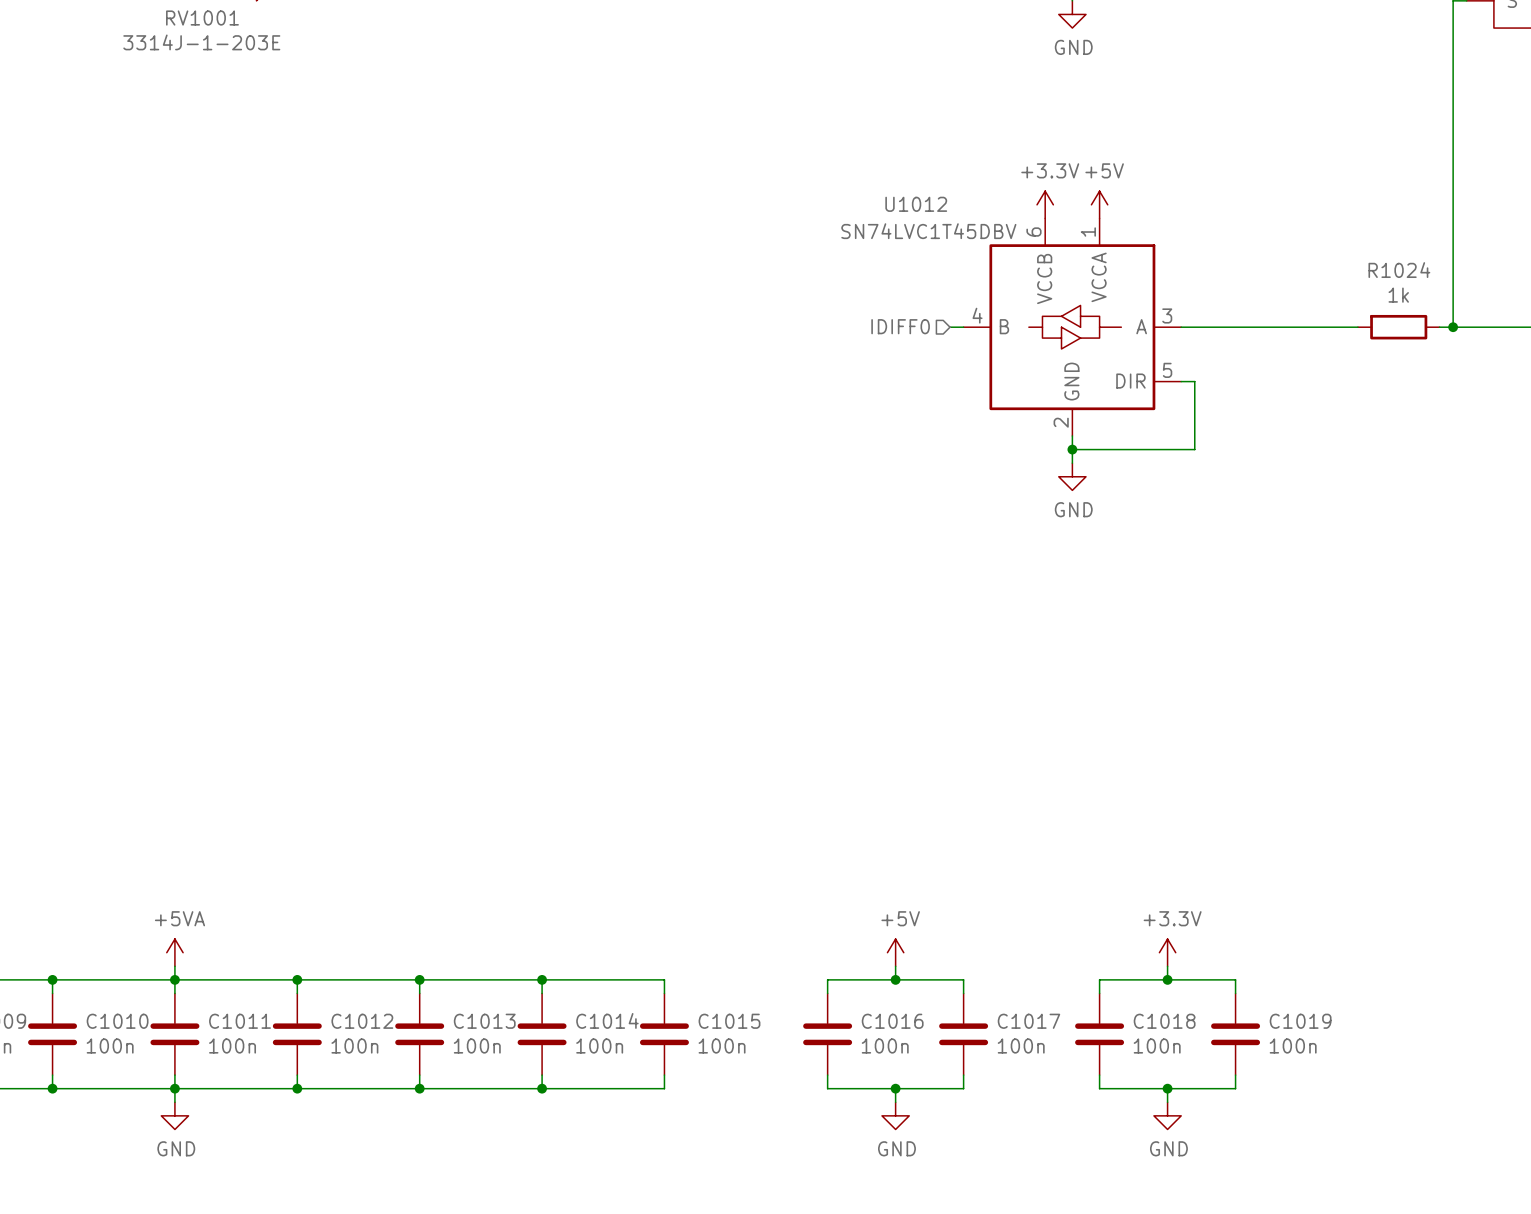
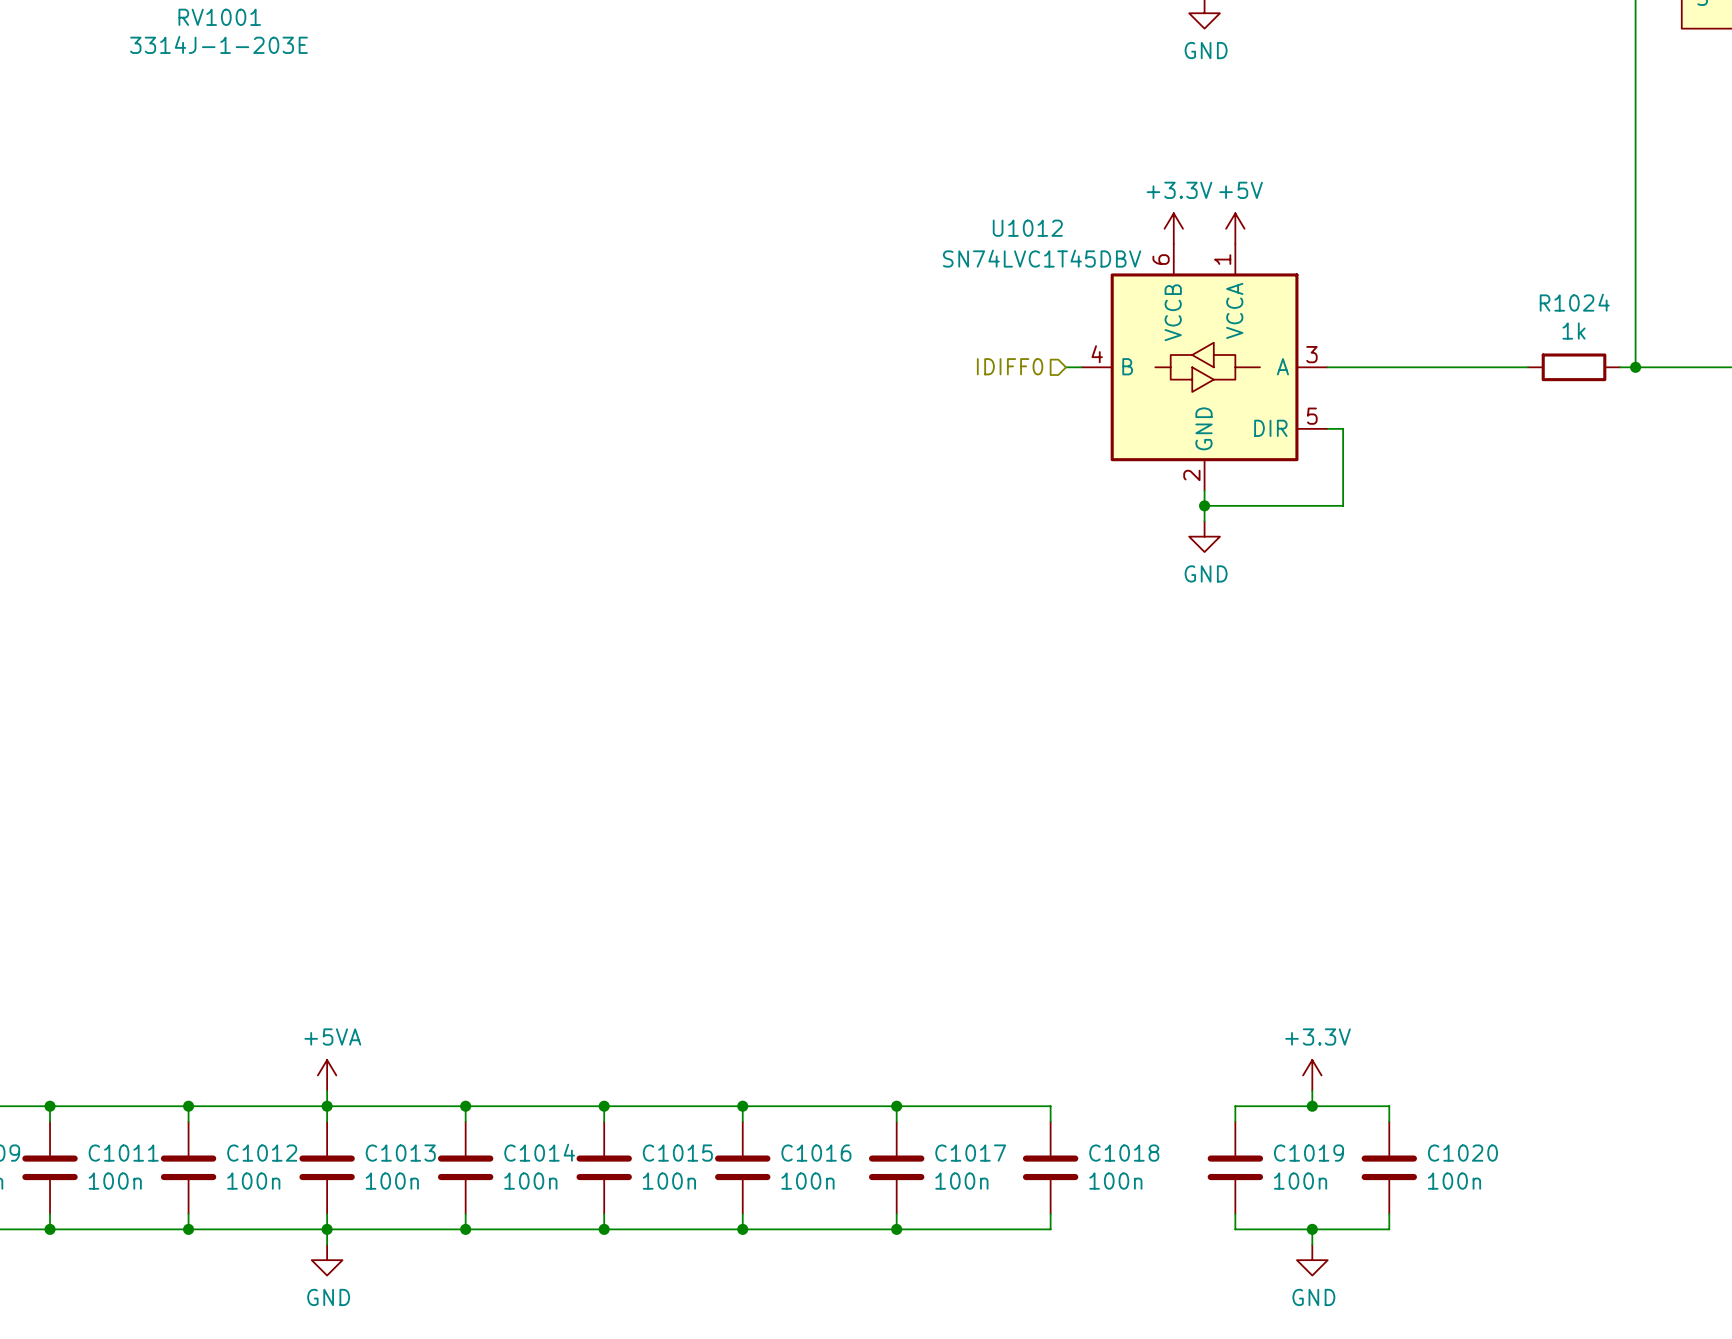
power symbol position: +5VA (174, 952) -> +5VA (327, 1075)
power symbol: +5V (895, 952) -> none
wire: (174, 966) (174, 979) -> (327, 1090) (327, 1106)
wire: (895, 966) (895, 979) -> (896, 1106) (896, 1121)
junction: none -> (742, 1106)
junction: none -> (896, 1106)
wire: (827, 979) (827, 993) -> (927, 1106) (742, 1106)
junction: (895, 979) -> none
wire: (936, 979) (963, 979) (963, 993) -> (1050, 1106) (1050, 1121)
C1014 name: C1014 (607, 1020) -> C1015 (677, 1153)
C1010 name: C1010 (117, 1021) -> C1011 (123, 1153)
C1011 name: C1011 (239, 1021) -> C1012 (262, 1153)
C1012 name: C1012 (362, 1021) -> C1013 (400, 1153)
C1013 name: C1013 (484, 1021) -> C1014 (539, 1152)
C1015 name: C1015 (729, 1021) -> C1016 (816, 1153)
C1018 name: C1018 (1164, 1021) -> C1019 (1308, 1153)
C1019 name: C1019 (1300, 1021) -> C1020 (1462, 1153)
C1016: 100n (827, 1034) -> none
C1018: none -> 100n (1050, 1167)
C1017 position: (963, 1034) -> (896, 1167)
wire: (827, 1075) (827, 1088) -> (742, 1229) (927, 1229)
wire: (963, 1075) (963, 1088) (936, 1088) -> (1050, 1213) (1050, 1229)
wire: (174, 1088) (174, 1102) -> (327, 1229) (327, 1244)
junction: none -> (742, 1229)
junction: none -> (896, 1229)
wire: (895, 1088) (895, 1102) -> (896, 1213) (896, 1229)
junction: (895, 1088) -> none
power symbol position: GND (174, 1115) -> GND (327, 1260)
power symbol: GND (895, 1115) -> none

